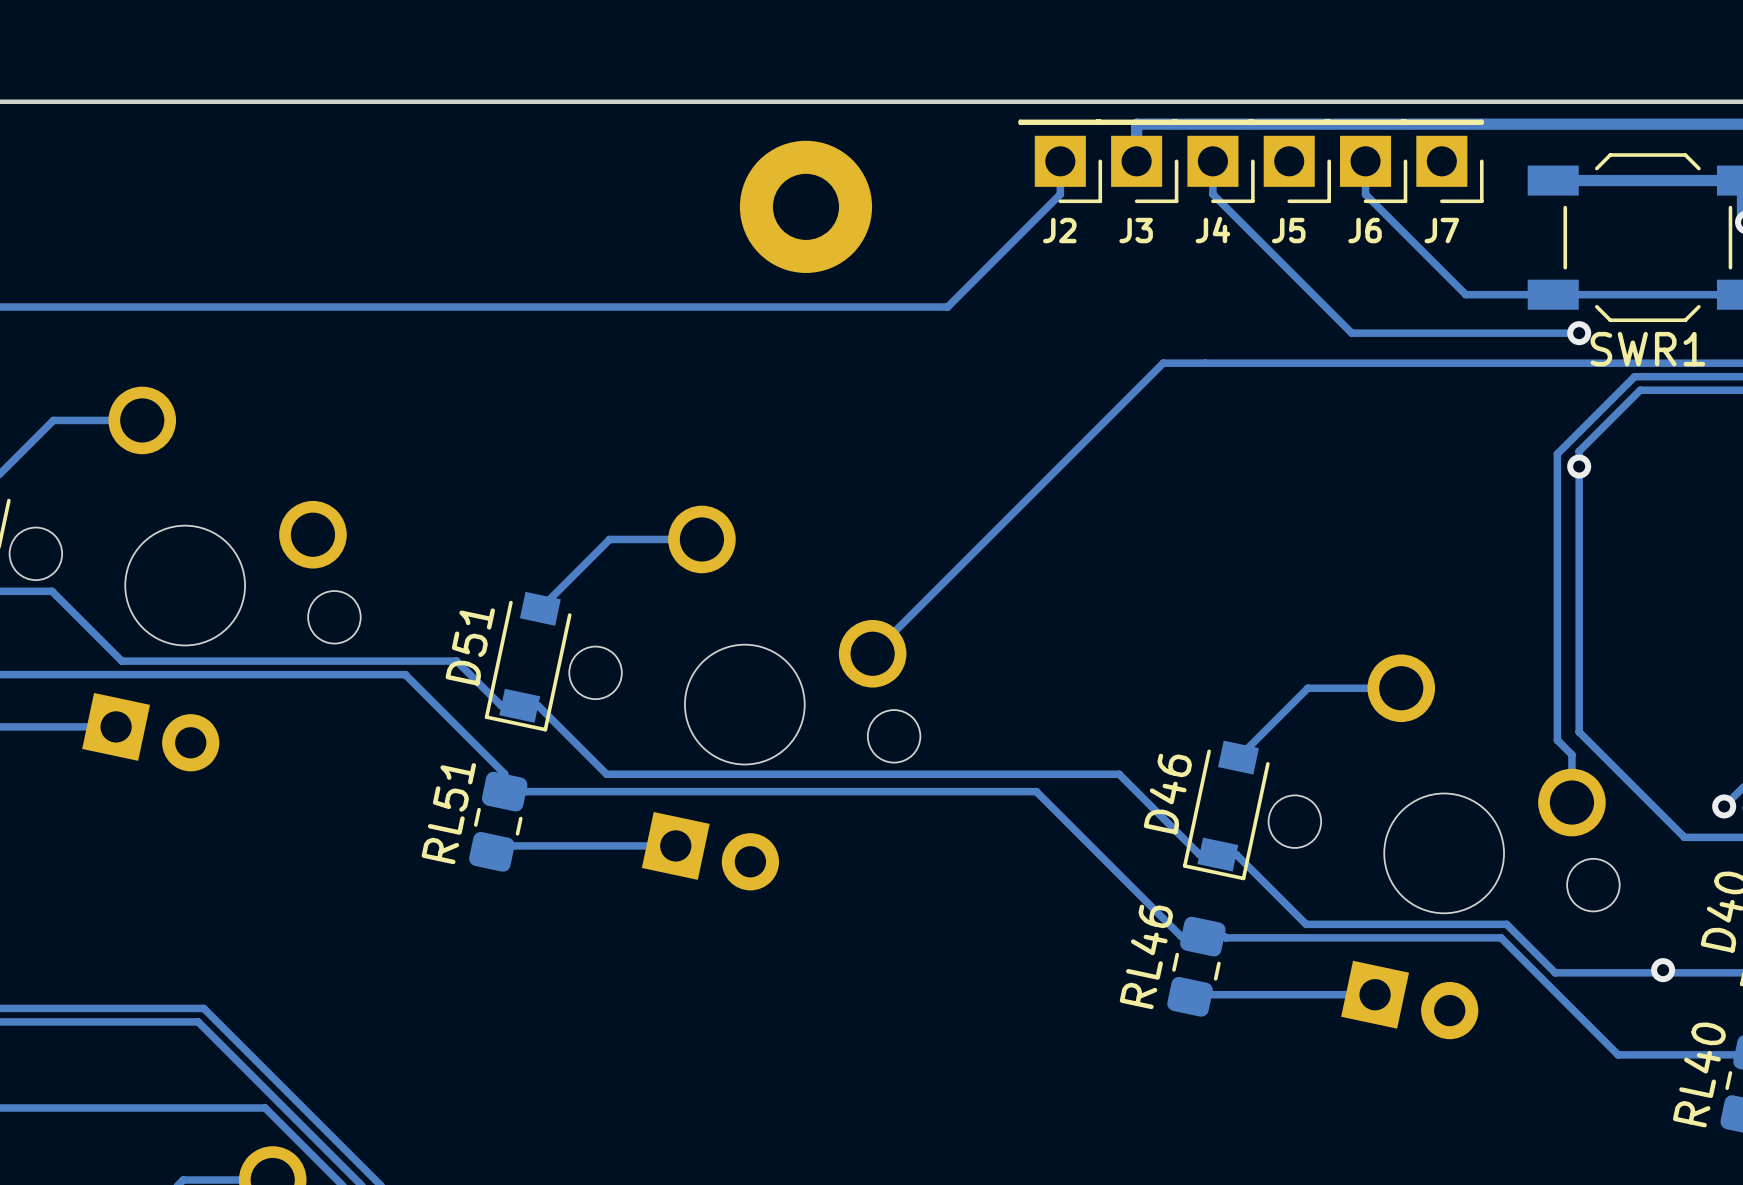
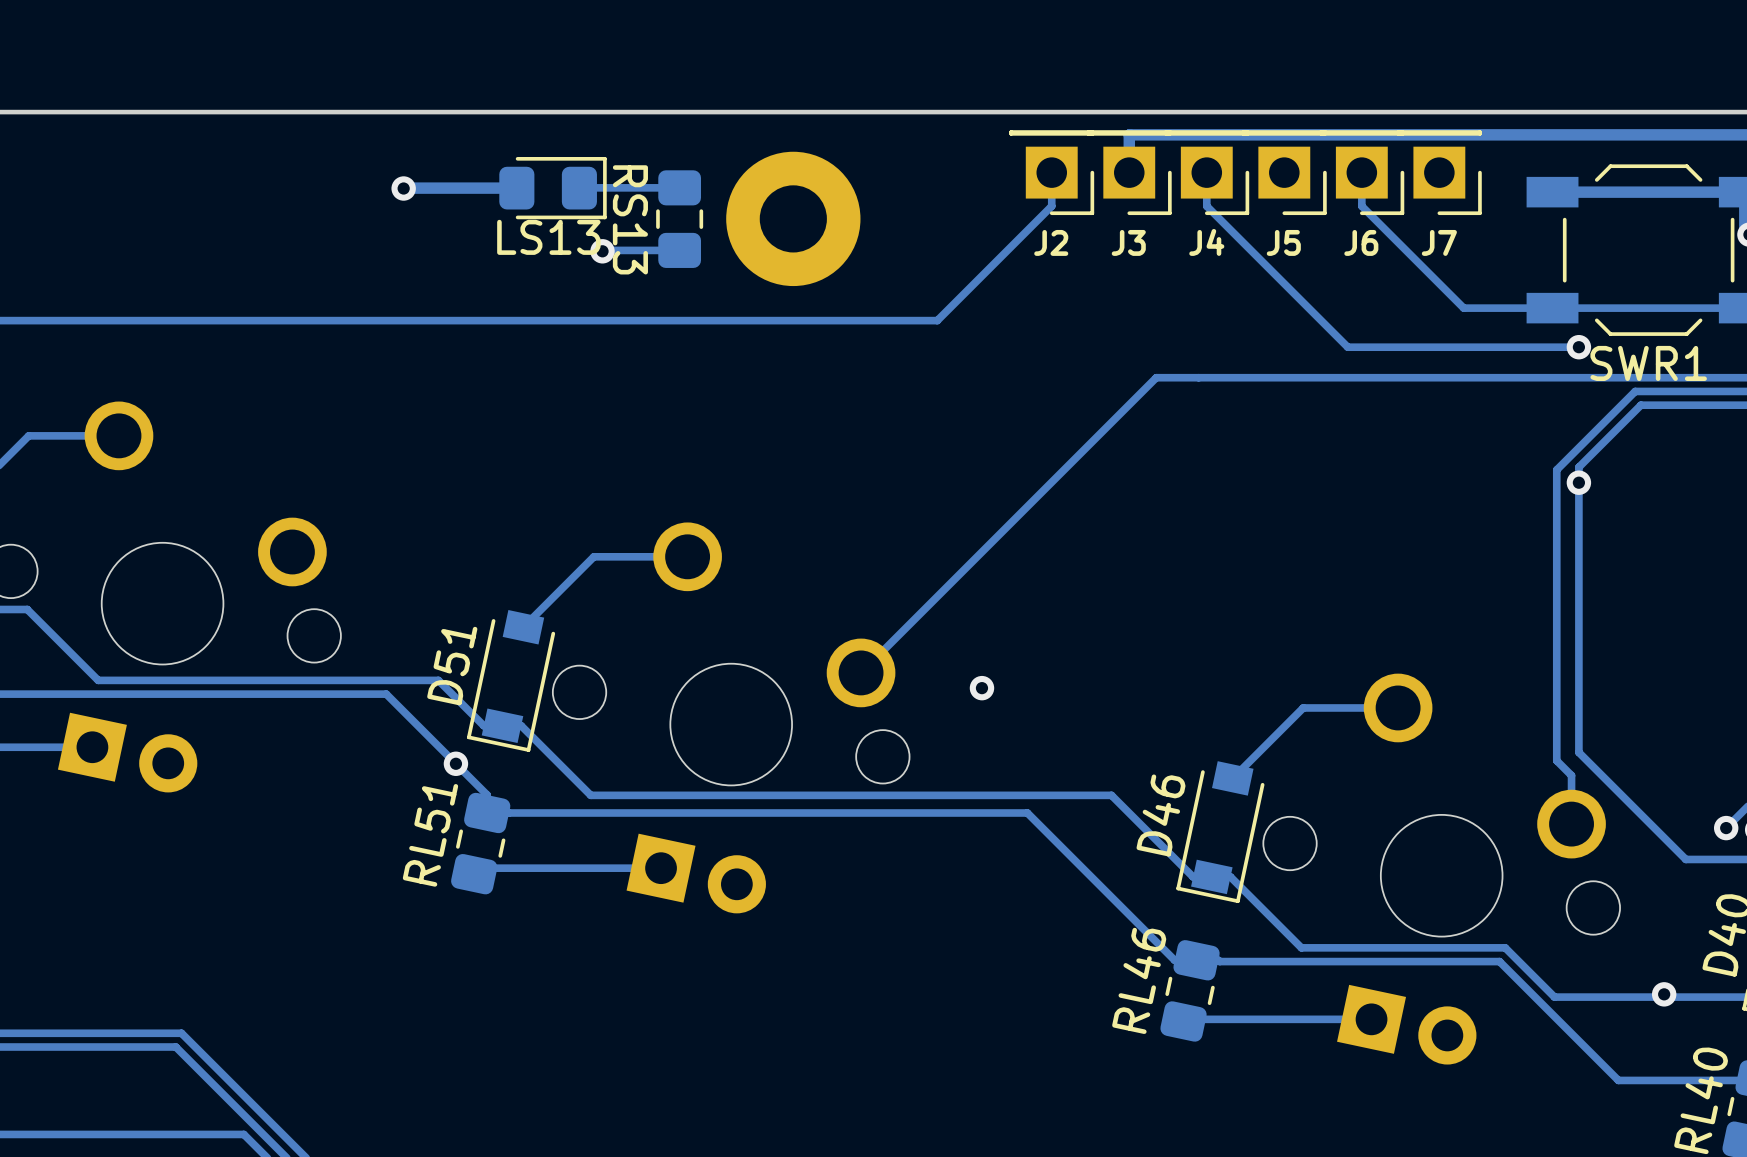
via: none -> (403, 188)
track: none -> (516, 188) (404, 188)
LS13: none -> (553, 188)
track: none -> (679, 187) (579, 187)
RS13: none -> (679, 219)
track: none -> (679, 250) (602, 251)
via: none -> (602, 251)
via: none -> (981, 688)
via: none -> (455, 763)

